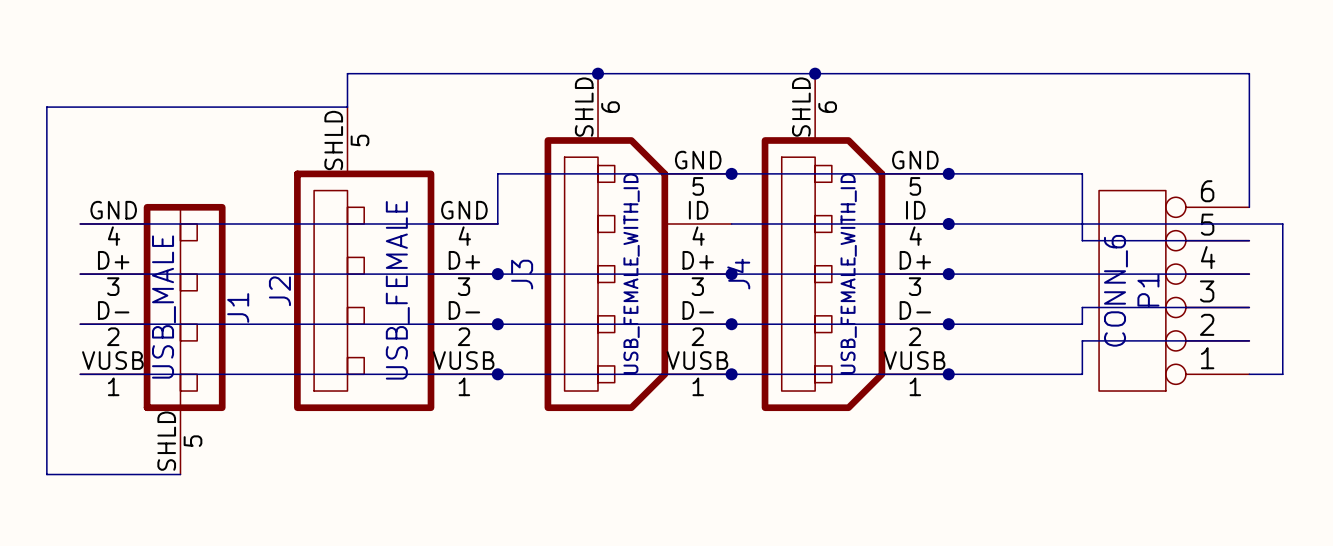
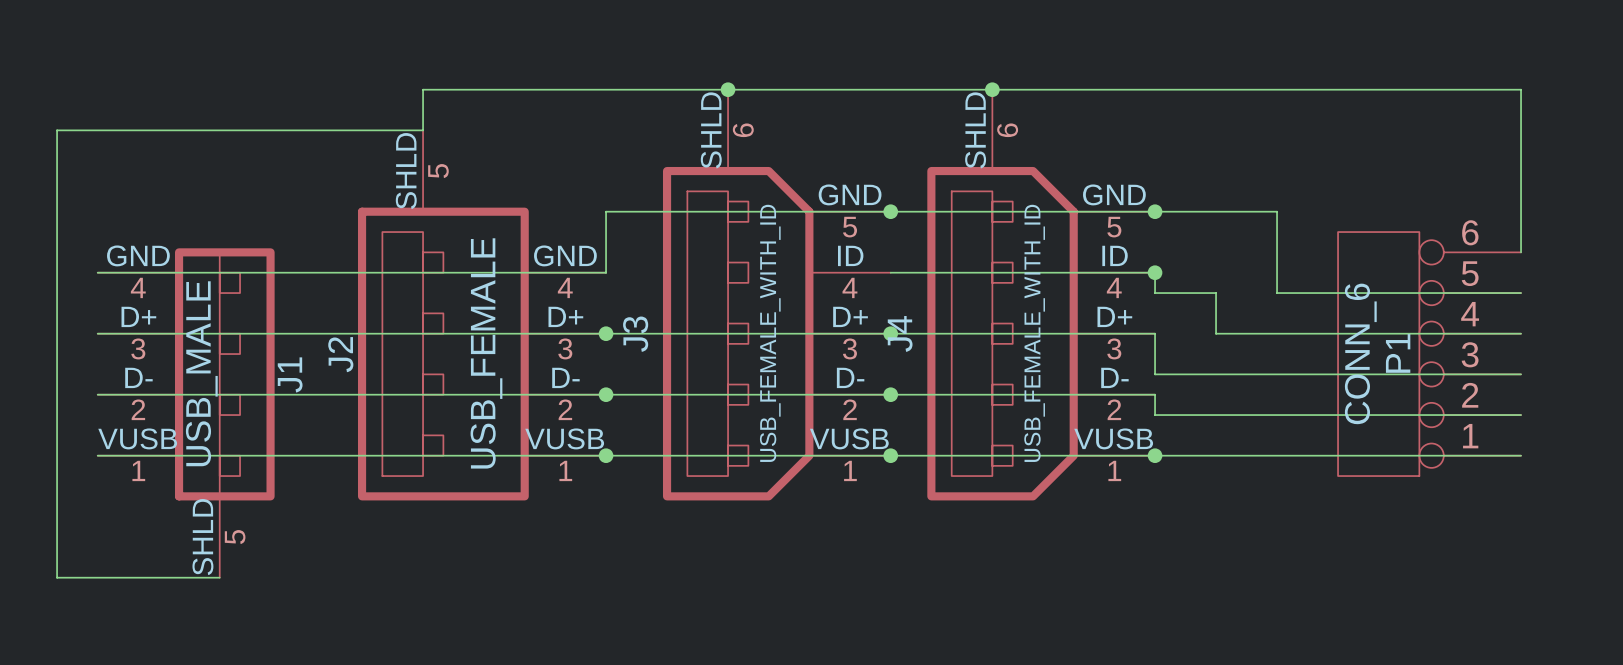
wire: (1048, 173) (1082, 173) (1082, 240) -> (1277, 211) (1277, 293) (1317, 293)
wire: (948, 223) (1282, 223) (1282, 374) (1249, 374) -> none
wire: (948, 274) (998, 274) -> (1155, 272) (1155, 293) (1216, 293) (1216, 333)
wire: none -> (1155, 333) (1155, 374) (1317, 374)
junction: (948, 274) -> none
wire: (1082, 307) (1082, 324) (948, 324) -> (1317, 415) (1155, 415) (1155, 394)
junction: (948, 324) -> none
wire: (1082, 340) (1082, 374) -> (1521, 455) (1317, 455)

